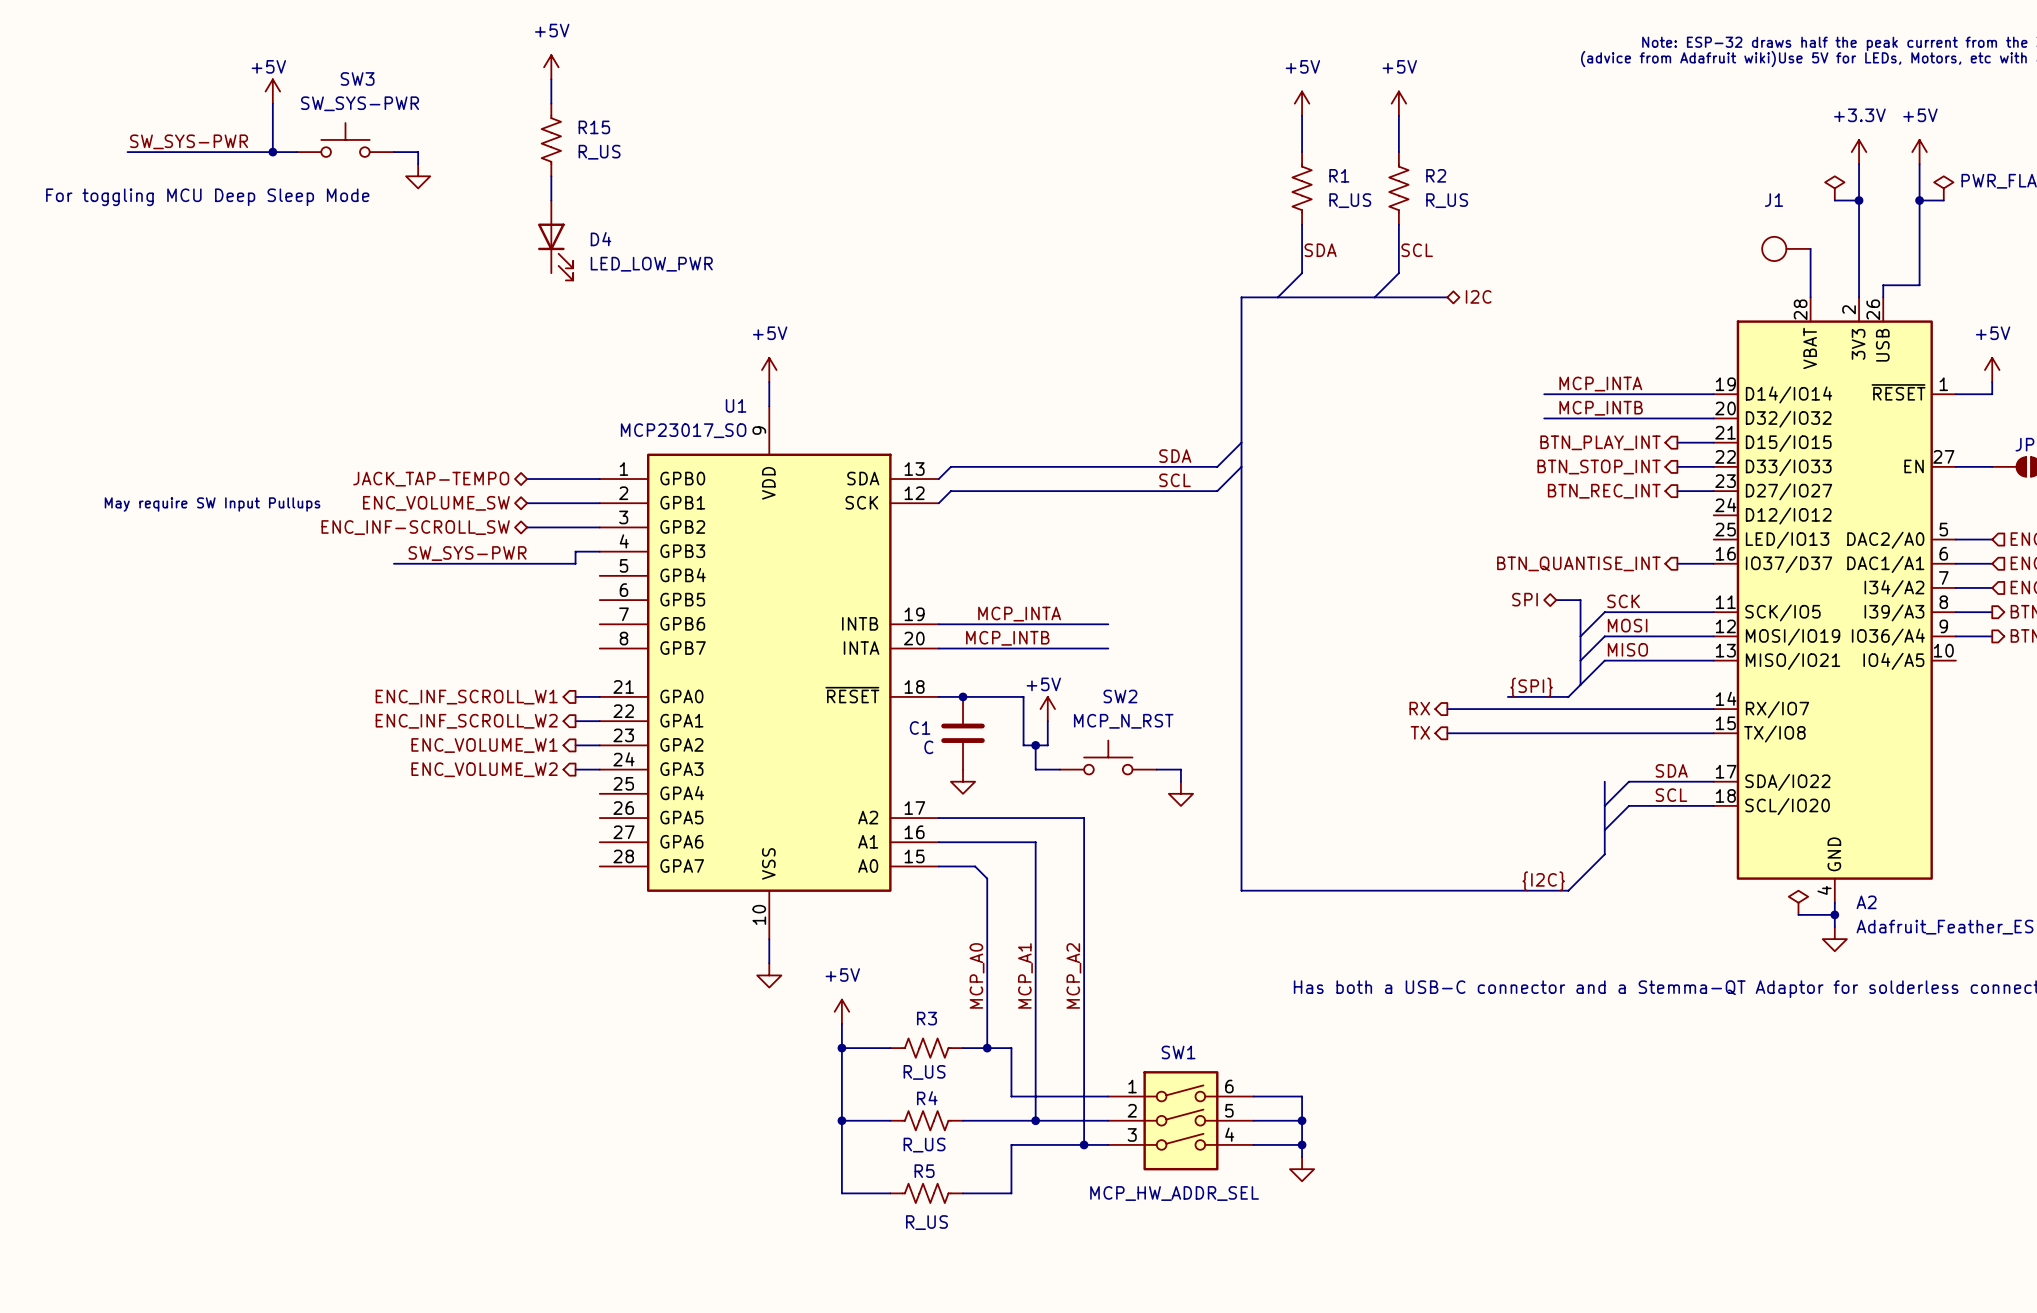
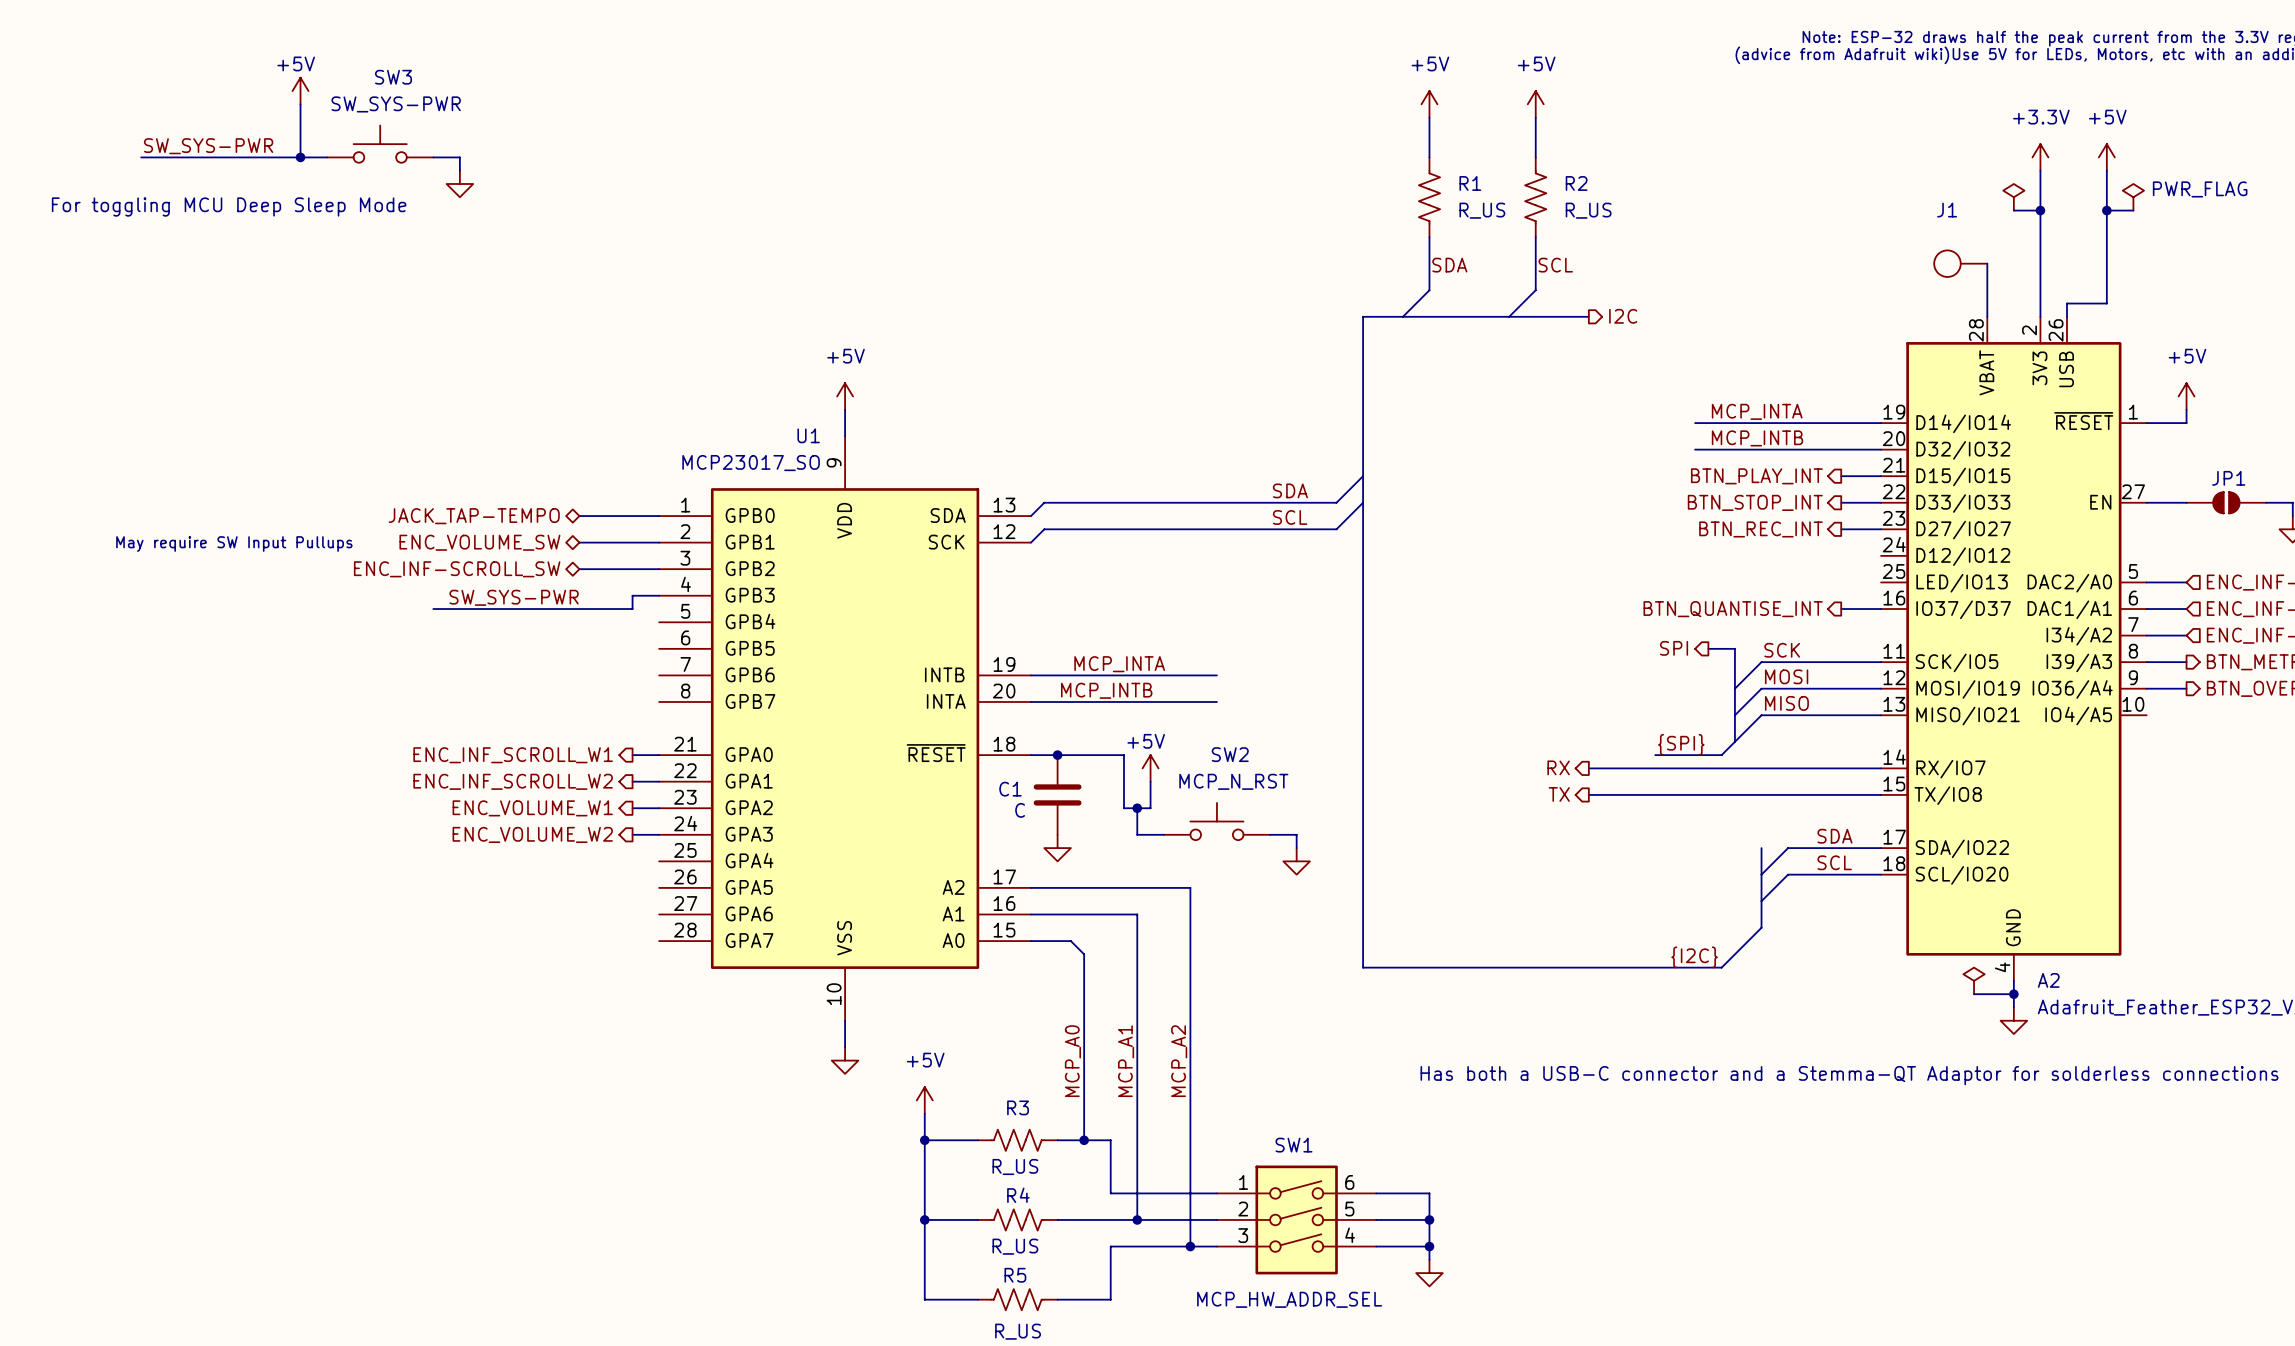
power symbol: +5V (551, 67) -> none
wire: (551, 79) (551, 103) -> none
R15: R_US (551, 139) -> none
wire: (551, 176) (551, 200) -> none
D4: LED_LOW_PWR (555, 240) -> none
hierarchical label shape: bidirectional (1478, 296) -> output (1623, 316)
hierarchical label shape: bidirectional (1525, 599) -> output (1674, 648)

